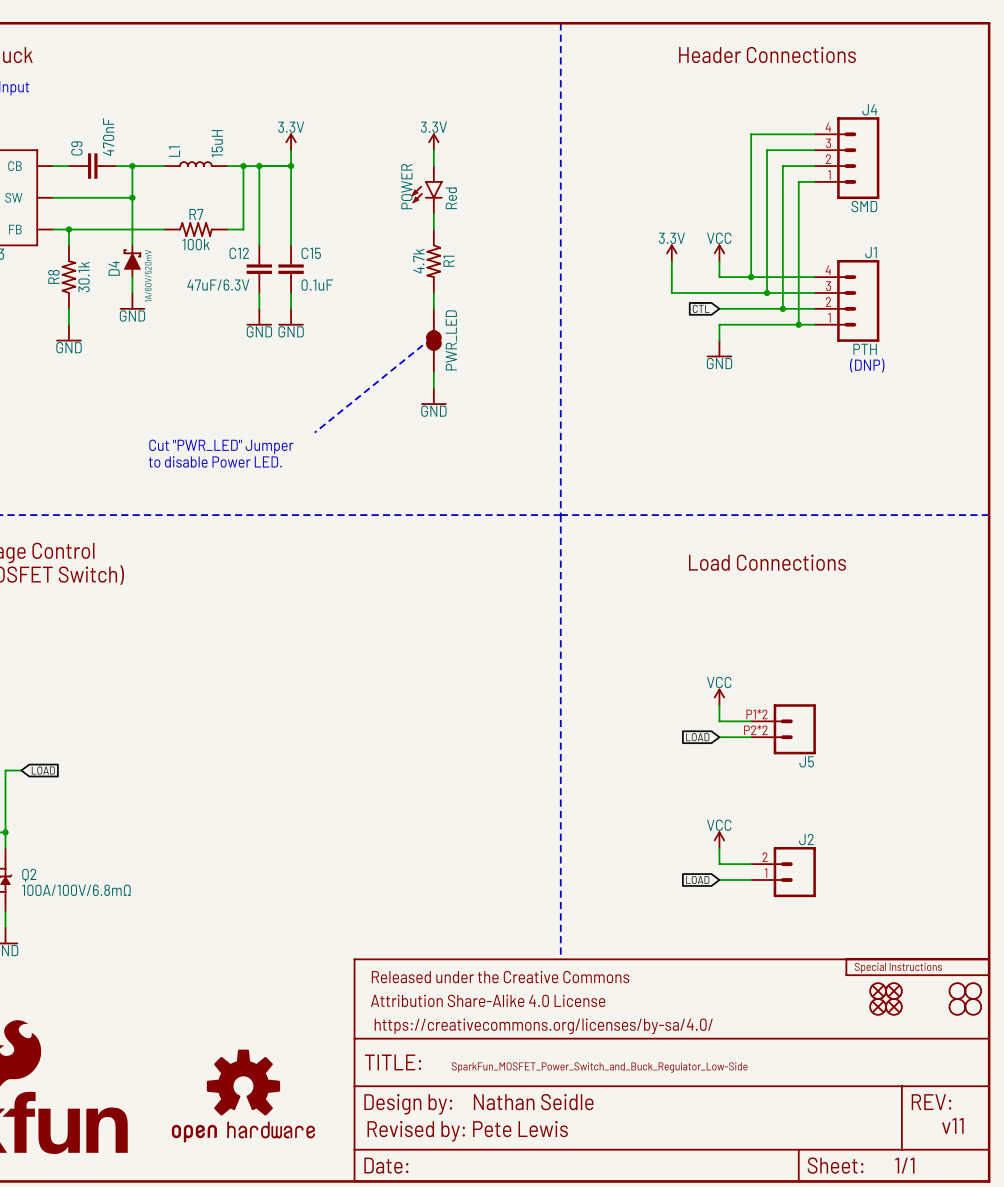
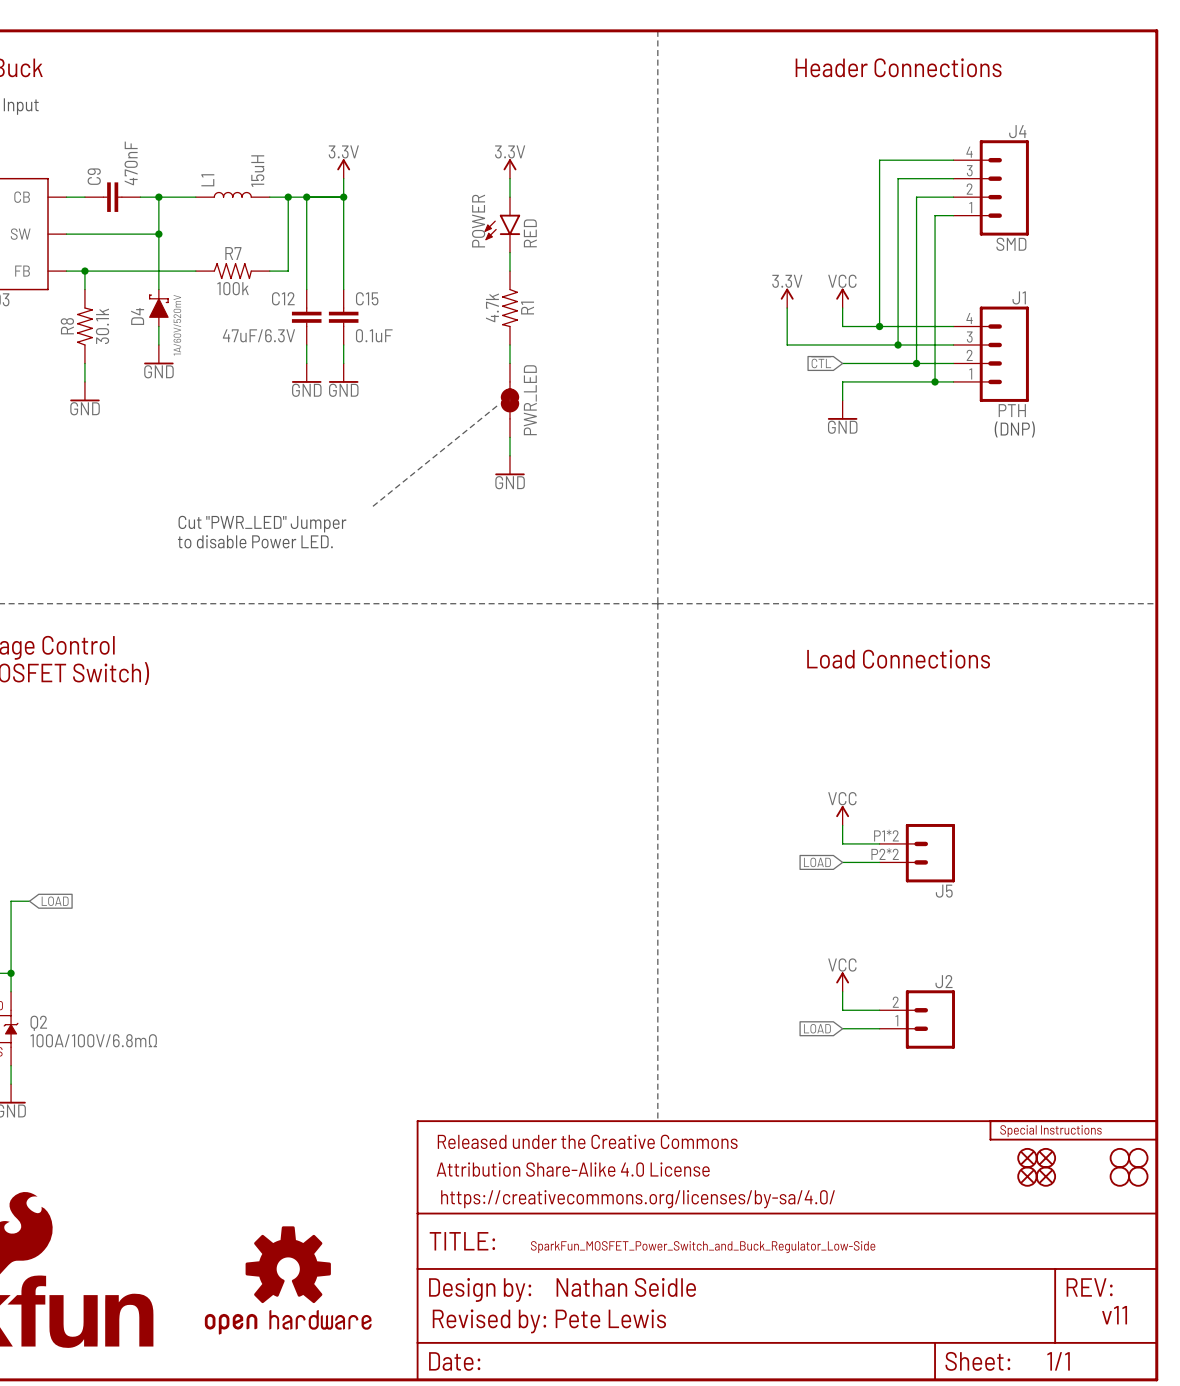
POWER value: Red (451, 198) -> RED (530, 233)

